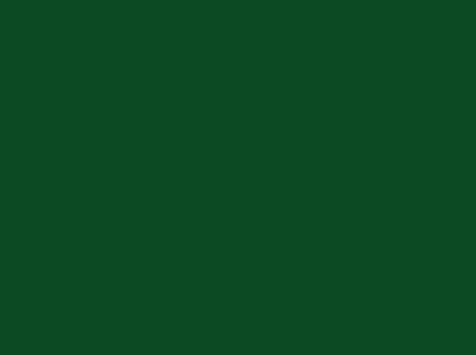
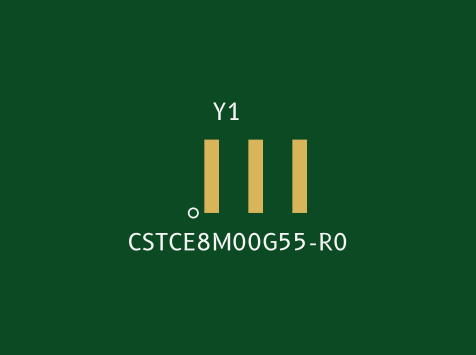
Y1: none -> CSTCE8M00G55-R0 (247, 178)

